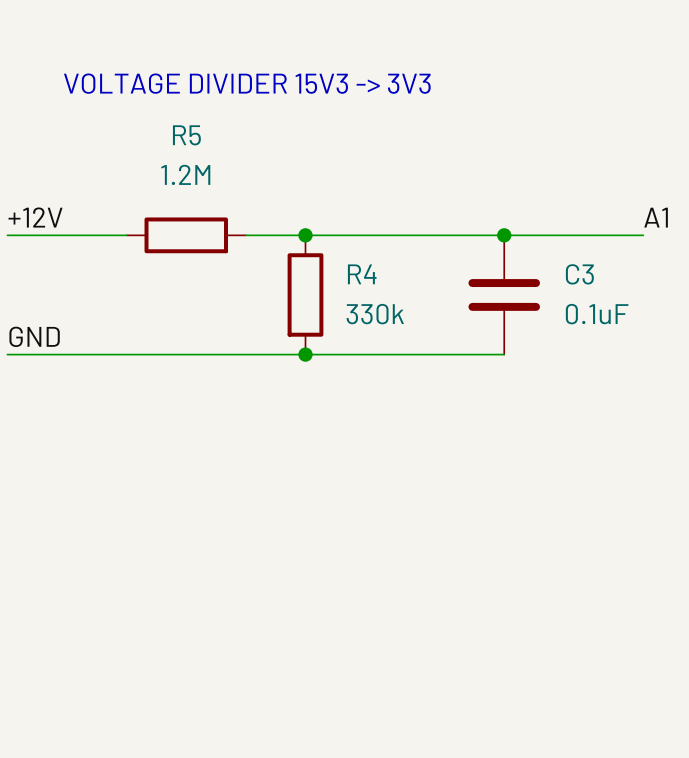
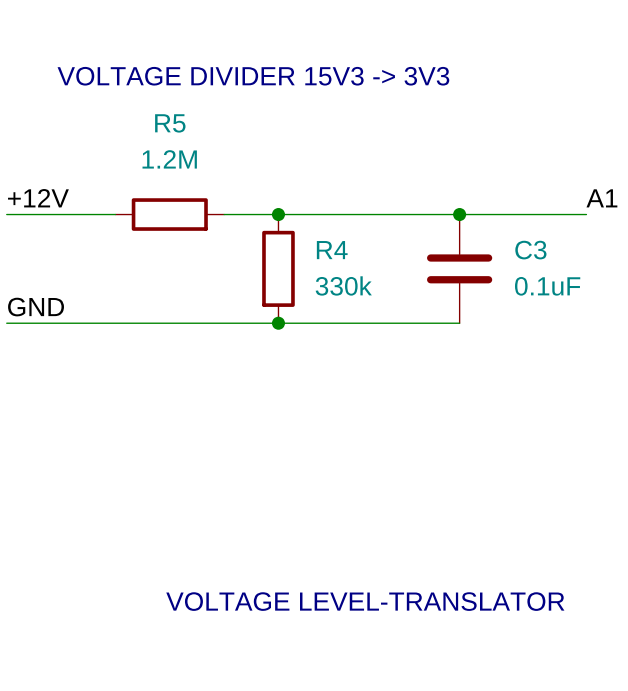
text: none -> VOLTAGE LEVEL-TRANSLATOR (365, 601)

